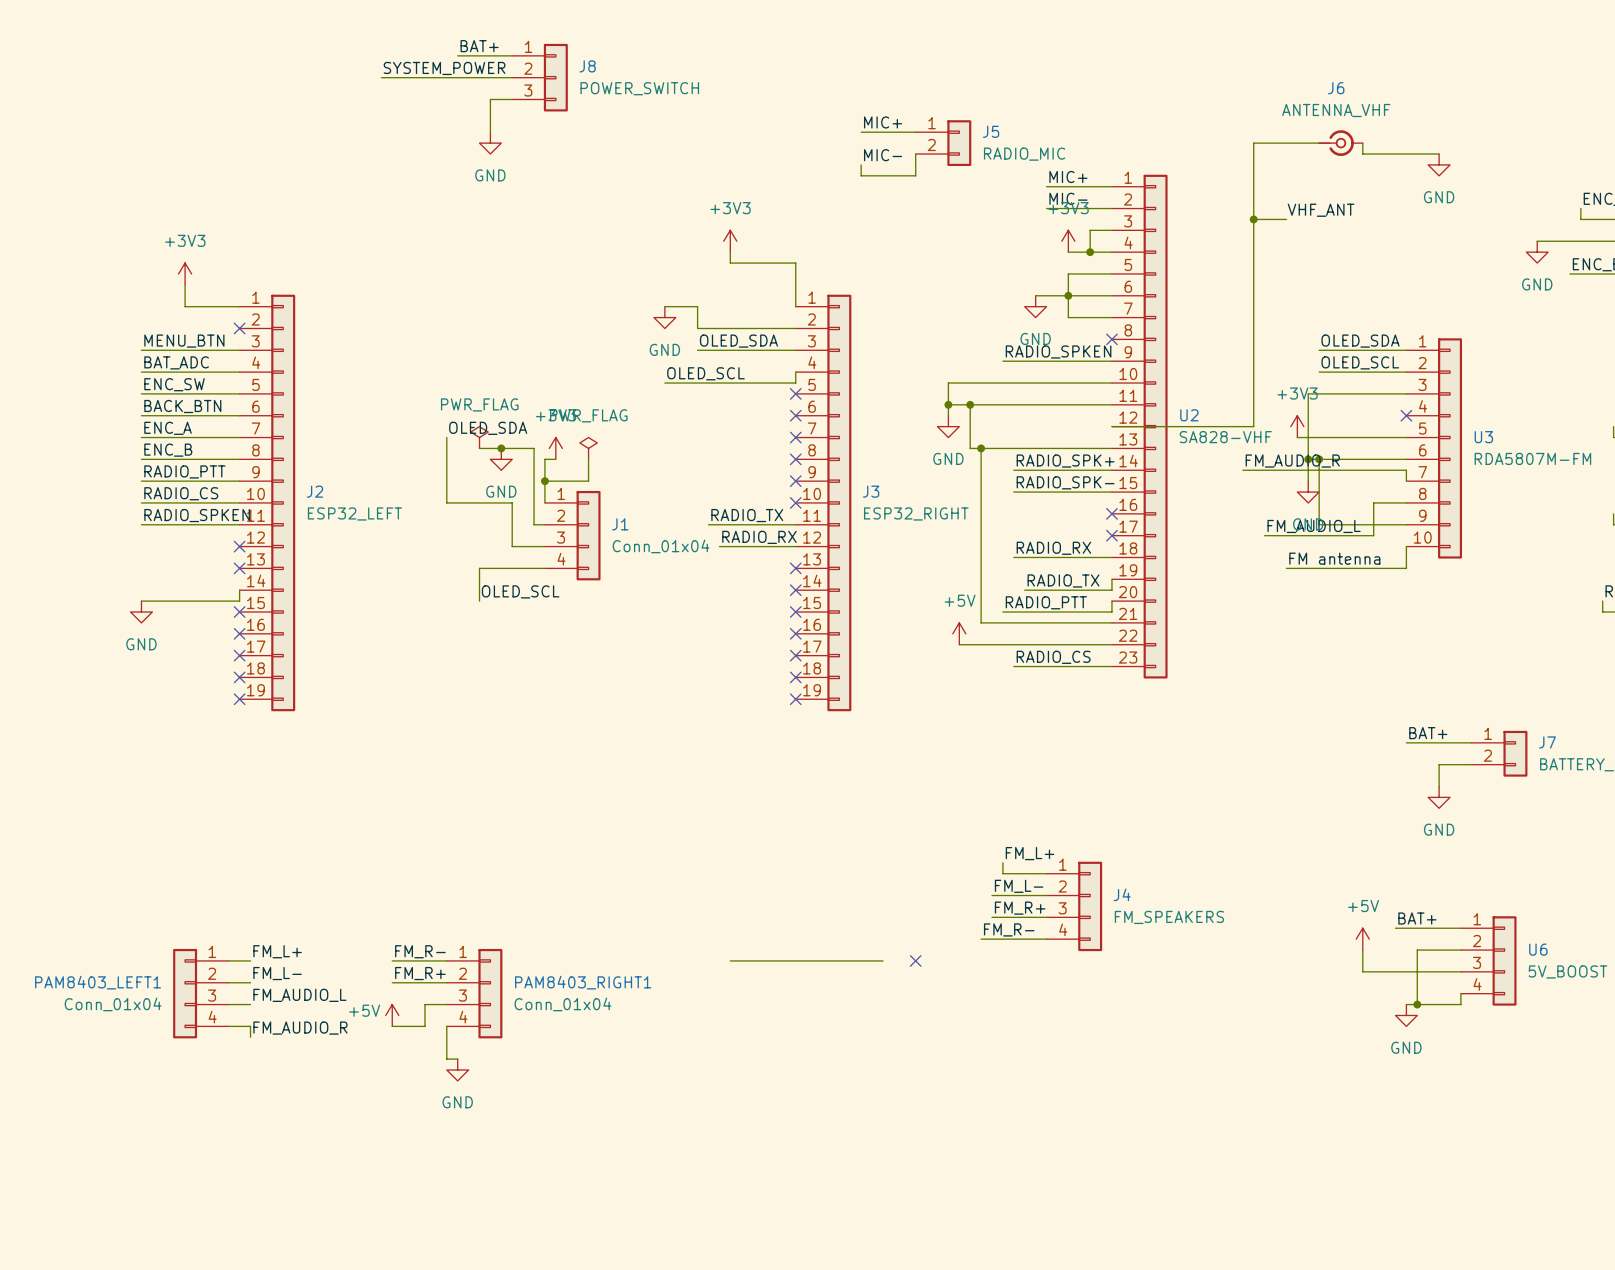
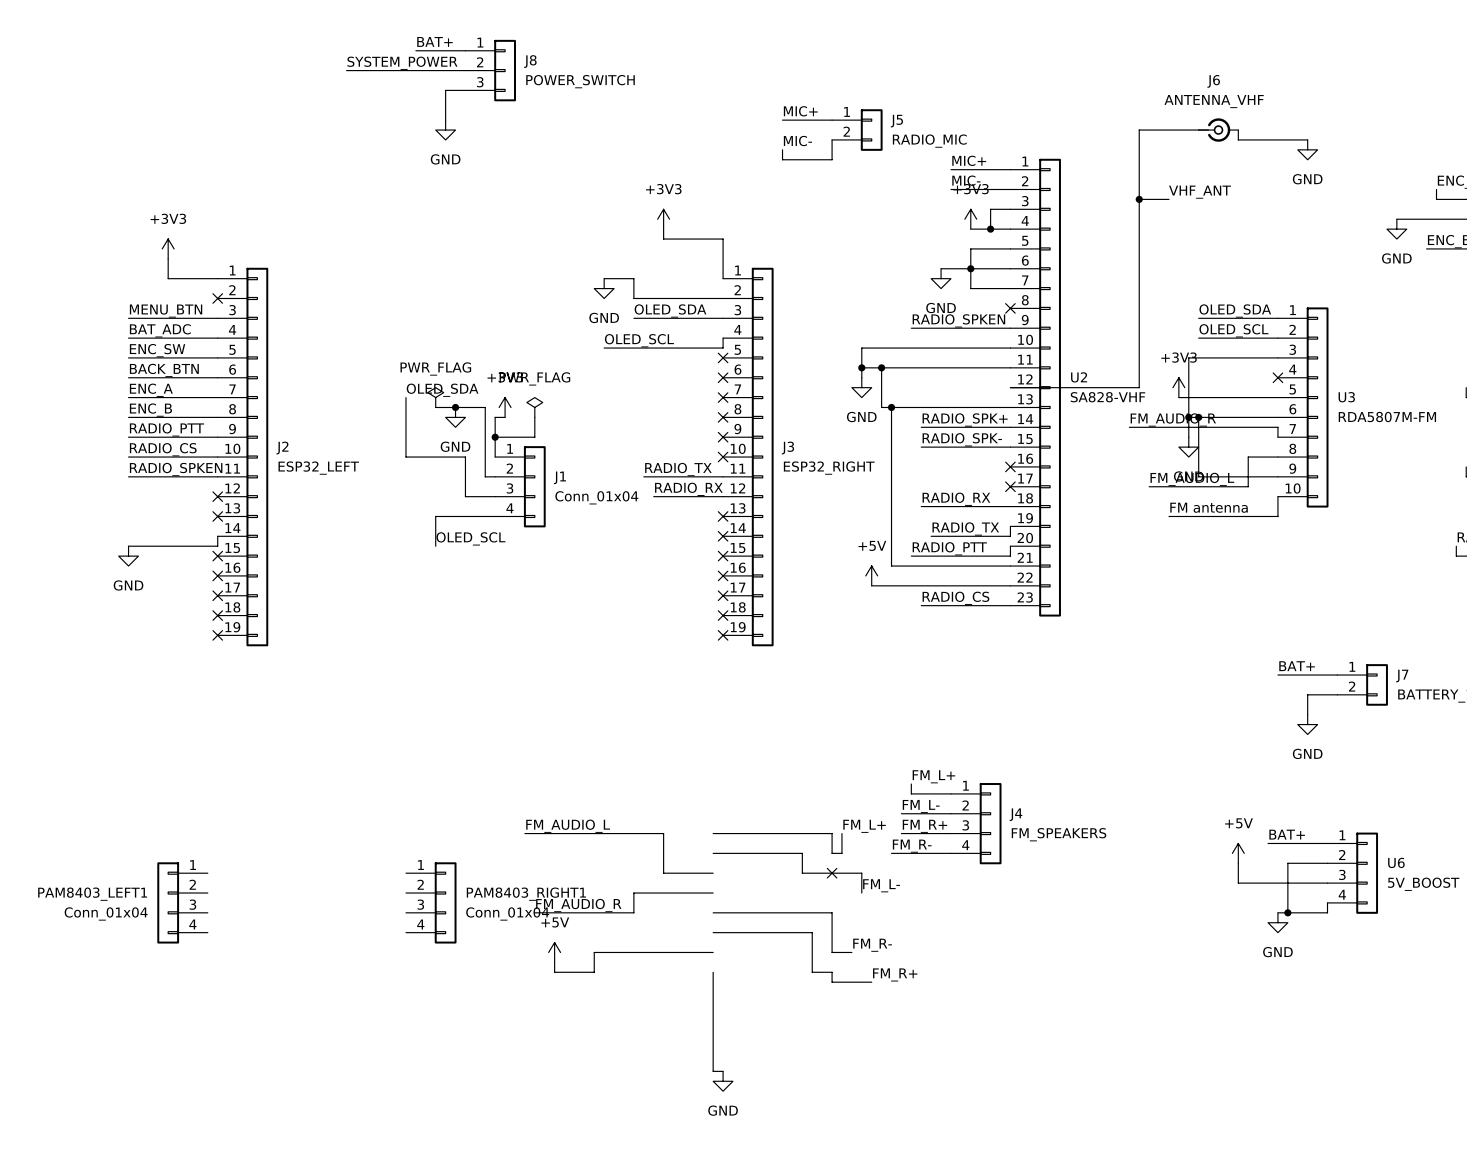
label: none -> FM_AUDIO_L (568, 826)
label: none -> FM_L+ (864, 826)
wire: none -> (524, 833) (663, 833) (663, 873)
wire: none -> (713, 833) (832, 833) (832, 853) (841, 853) (841, 833)
wire: none -> (713, 853) (802, 853) (802, 873) (861, 873) (861, 893)
label: FM_L+ (277, 951) -> none
label: FM_R- (420, 951) -> none
wire: (228, 960) (250, 960) -> none
wire: (392, 960) (446, 960) -> none
wire: (784, 960) (882, 960) -> none
label: FM_L- (277, 973) -> none
label: FM_R+ (420, 973) -> none
label: none -> FM_L- (881, 885)
wire: (228, 982) (250, 982) -> none
wire: (392, 982) (446, 982) -> none
wire: none -> (713, 893) (633, 893) (633, 912) (534, 912)
label: FM_AUDIO_L (299, 995) -> none
label: none -> FM_AUDIO_R (578, 905)
wire: (228, 1004) (250, 1004) -> none
wire: (446, 1004) (424, 1004) (424, 1026) (392, 1026) -> none
wire: none -> (713, 912) (832, 912) (832, 952) (851, 952)
power symbol: +5V (392, 1015) -> none
wire: (228, 1026) (250, 1026) (250, 1037) -> none
wire: (446, 1026) (446, 1059) (457, 1059) -> none
wire: none -> (713, 932) (812, 932) (812, 972) (832, 972) (832, 982) (871, 982)
label: FM_AUDIO_R (300, 1028) -> none
label: none -> FM_R- (872, 945)
power symbol: none -> +5V (554, 952)
wire: none -> (713, 952) (594, 952) (594, 972) (554, 972) (554, 962)
power symbol: GND (457, 1070) -> none
wire: none -> (713, 972) (713, 1071) (723, 1071)
label: none -> FM_R+ (895, 974)
power symbol: none -> GND (723, 1081)

